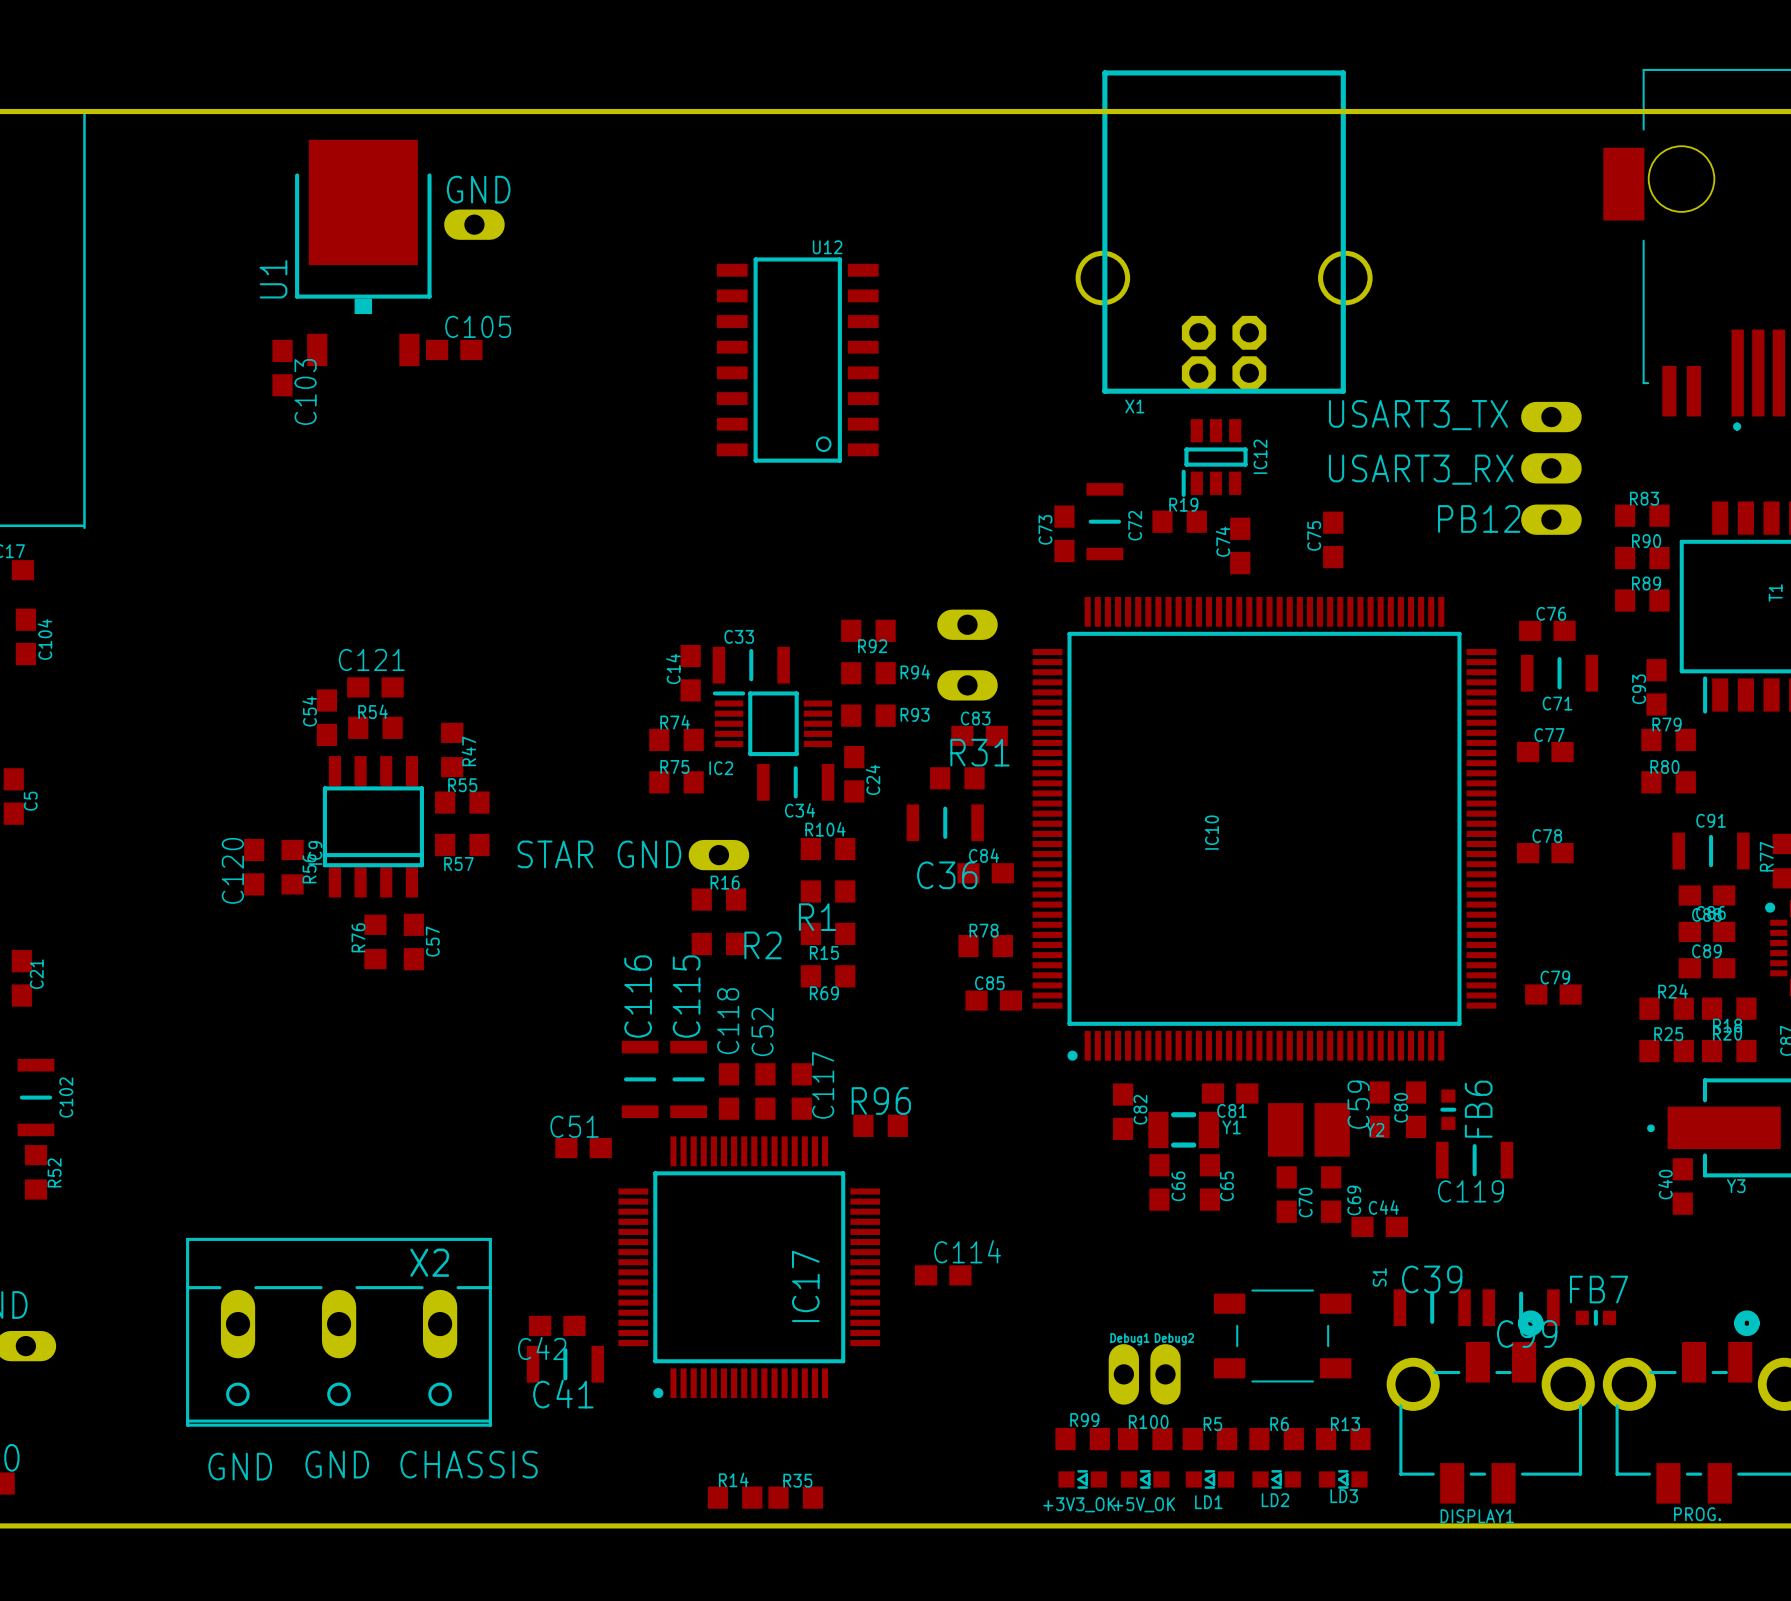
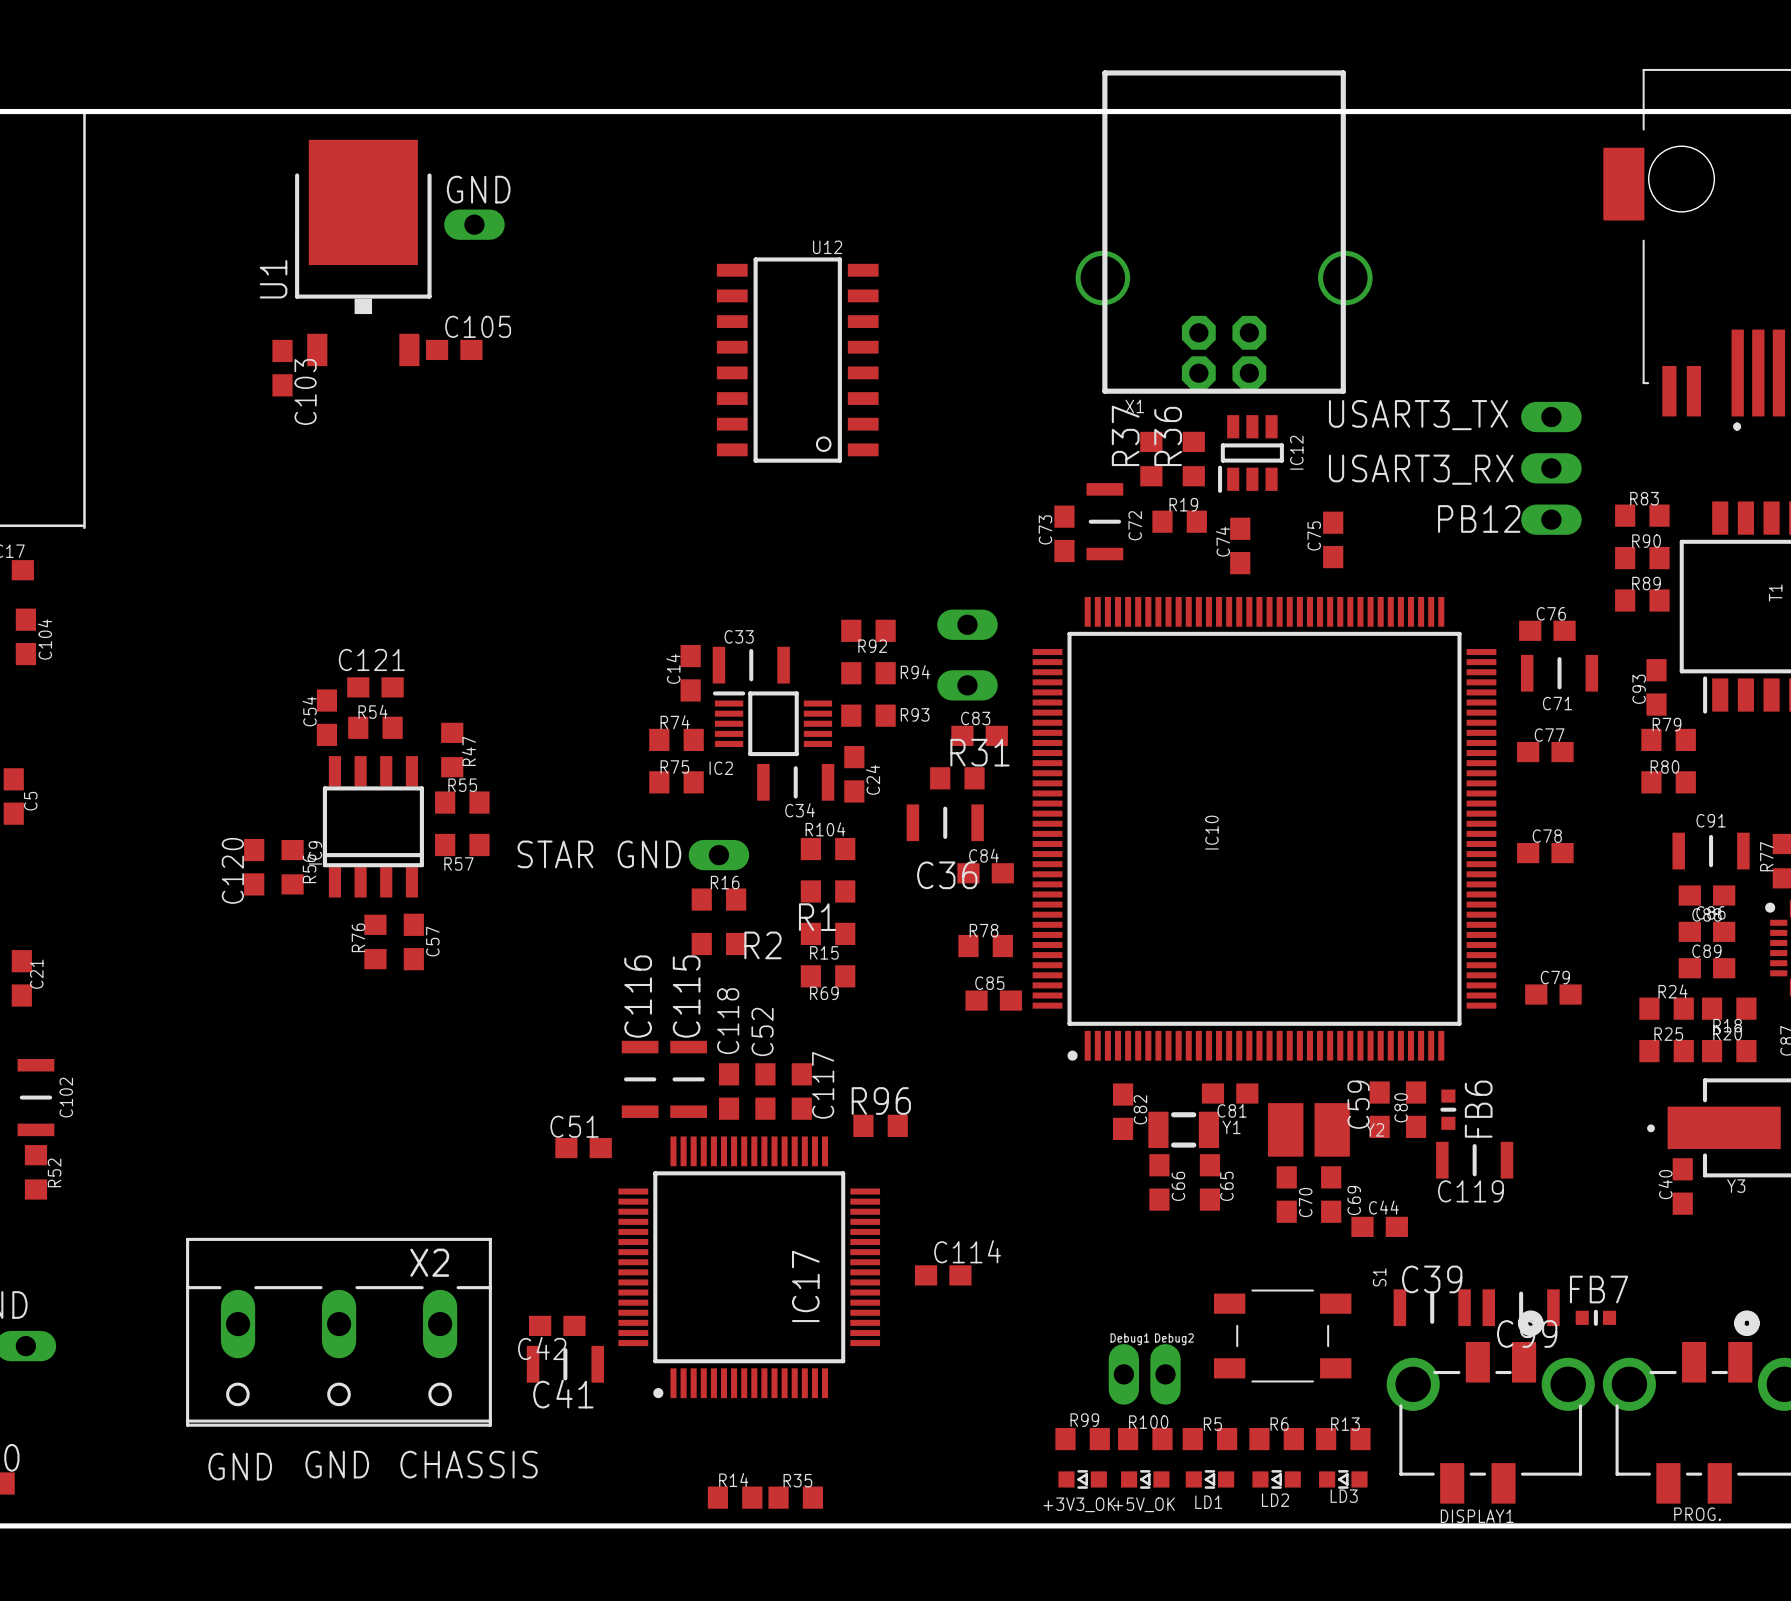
IC12 position: (1214, 458) -> (1250, 454)
R37: none -> (1151, 459)
R36: none -> (1193, 459)

